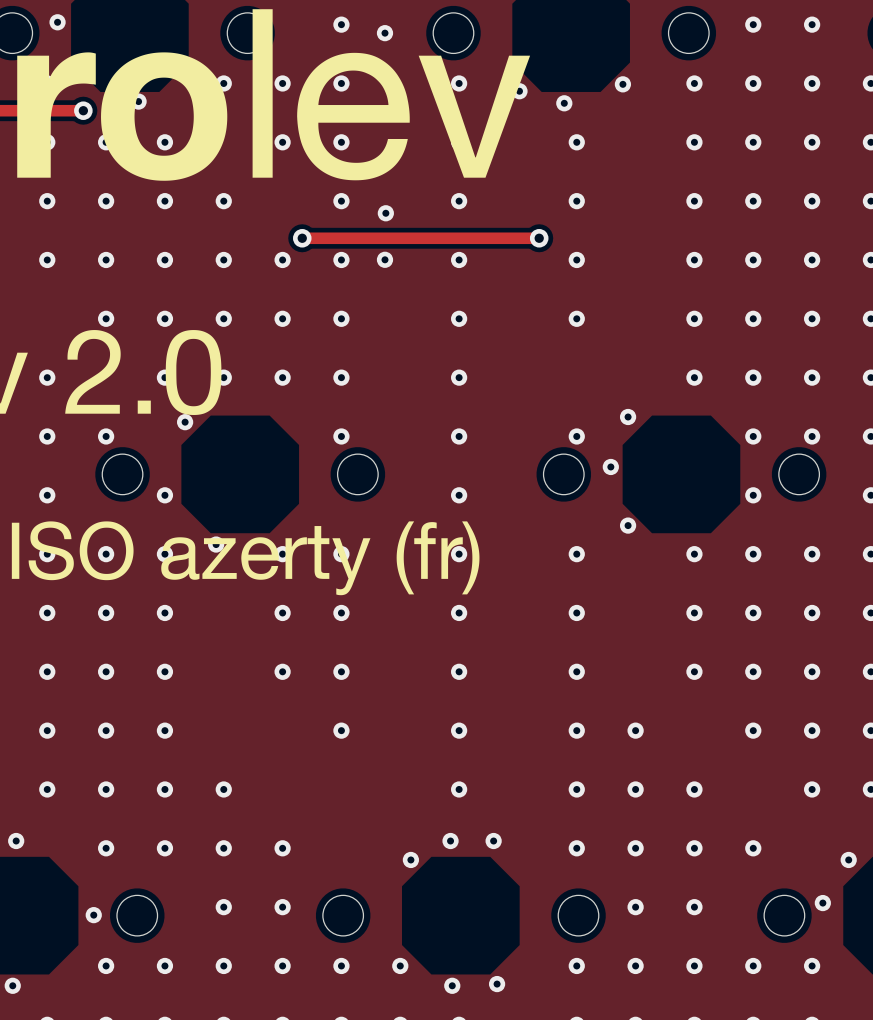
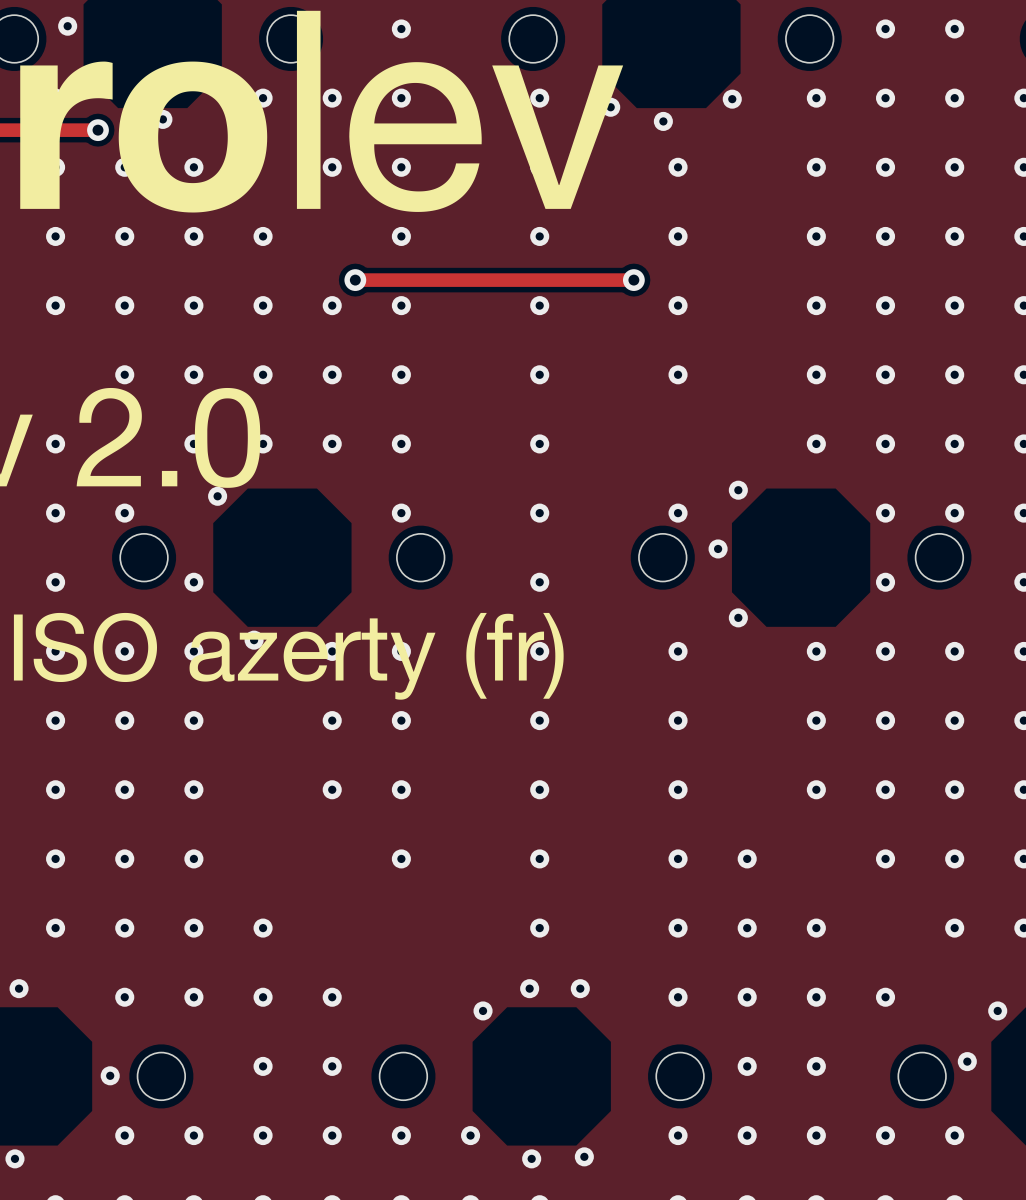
via: (384, 33) -> none
via: (385, 213) -> none
via: (384, 259) -> none

